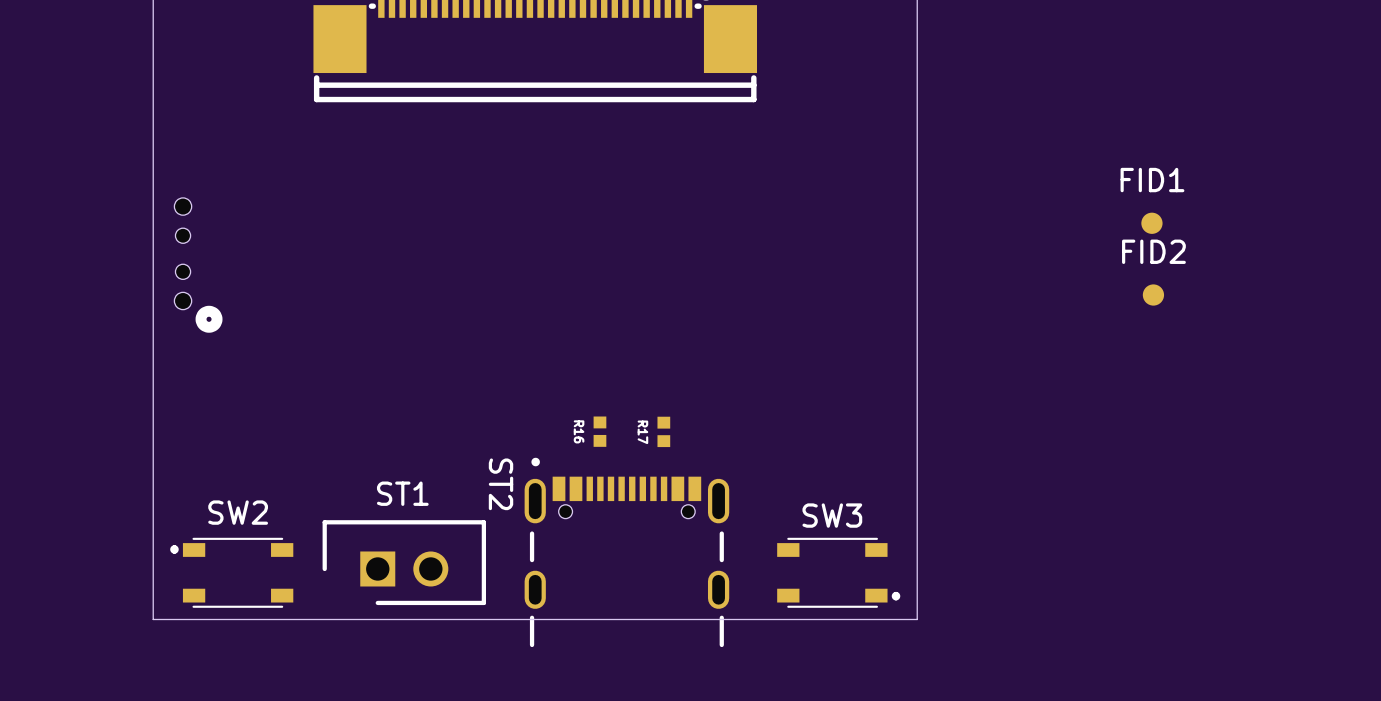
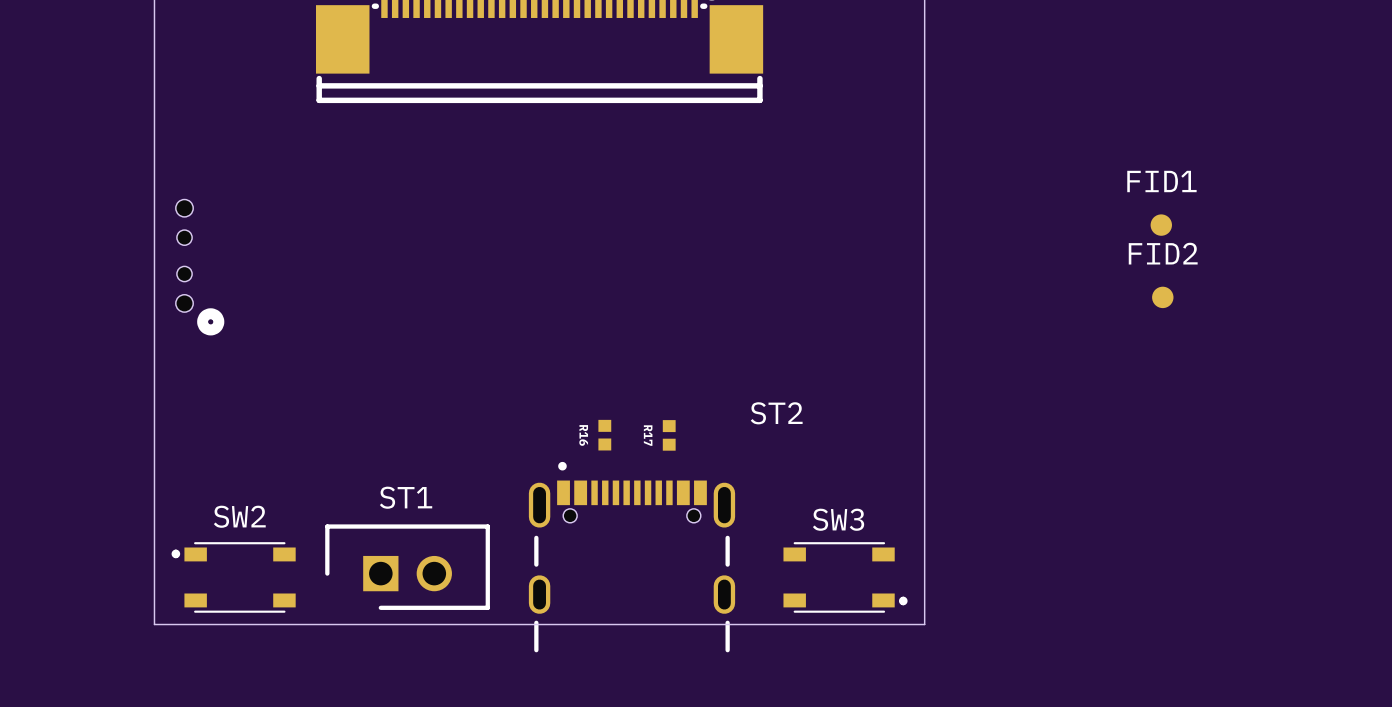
ST2 footprint: [524, 457, 730, 648] -> [528, 461, 736, 653]
ST2 name position: ST2 (501, 484) -> ST2 (776, 413)

